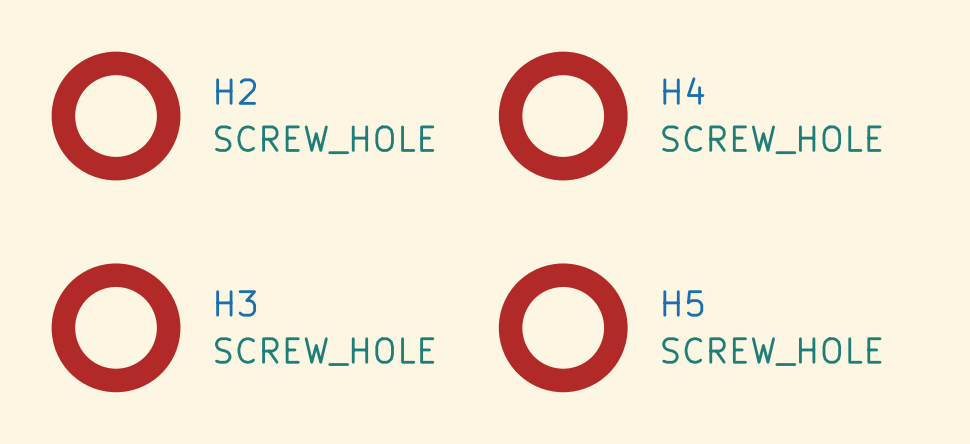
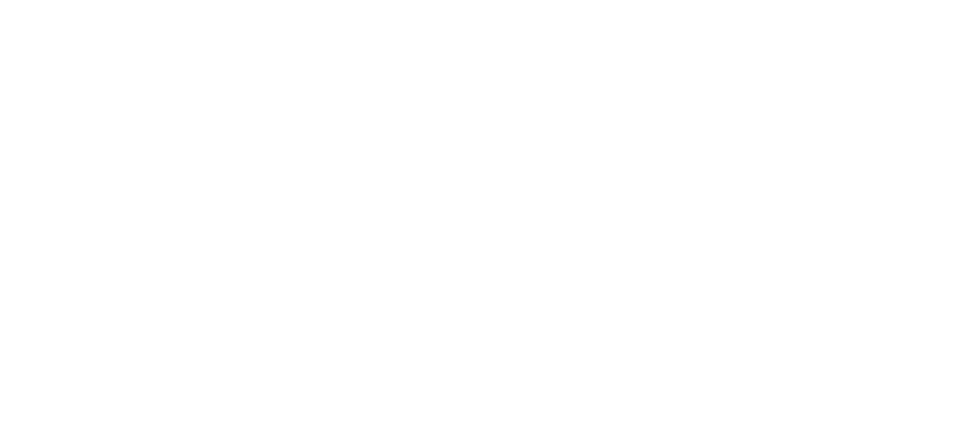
H2: SCREW_HOLE (116, 116) -> none
H4: SCREW_HOLE (563, 116) -> none
H3: SCREW_HOLE (116, 327) -> none
H5: SCREW_HOLE (563, 327) -> none

